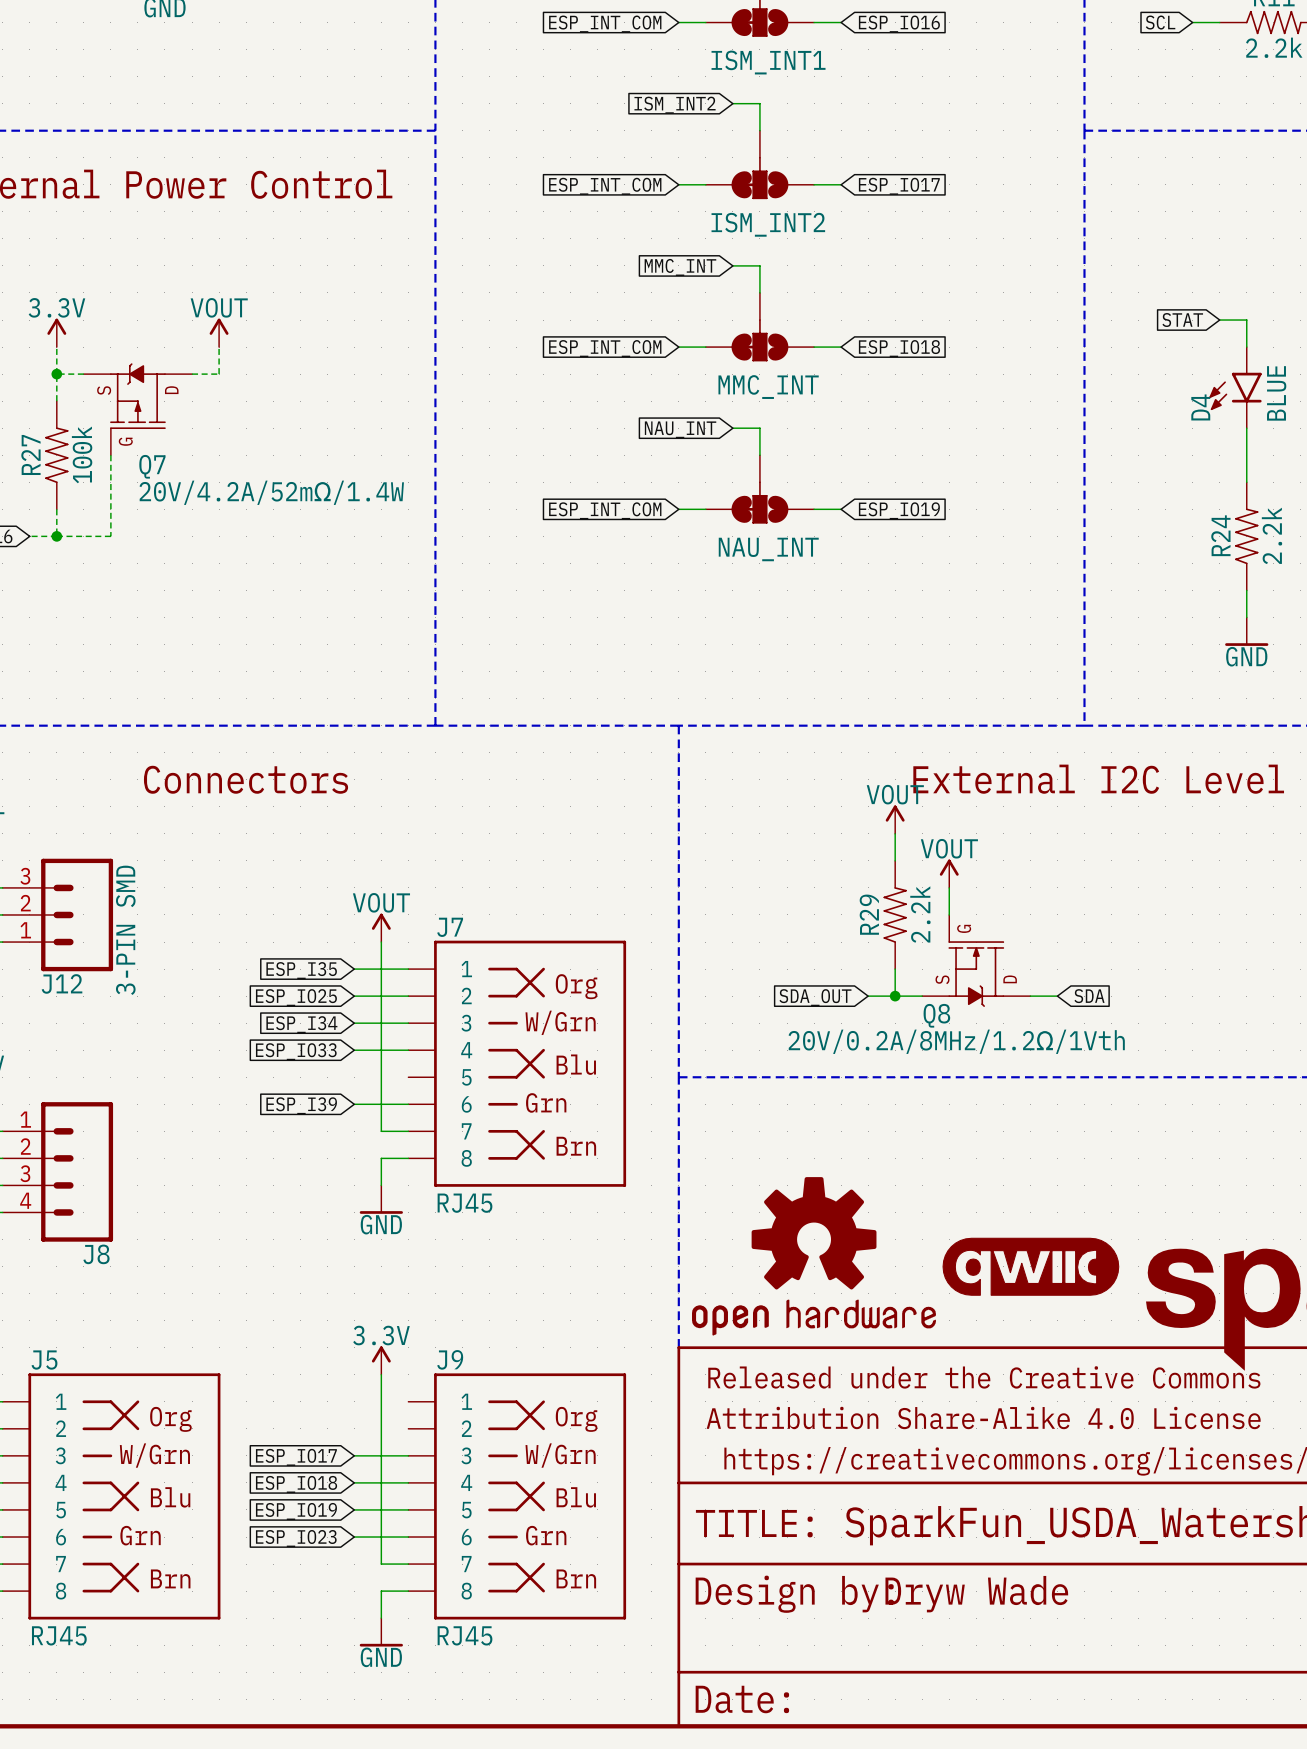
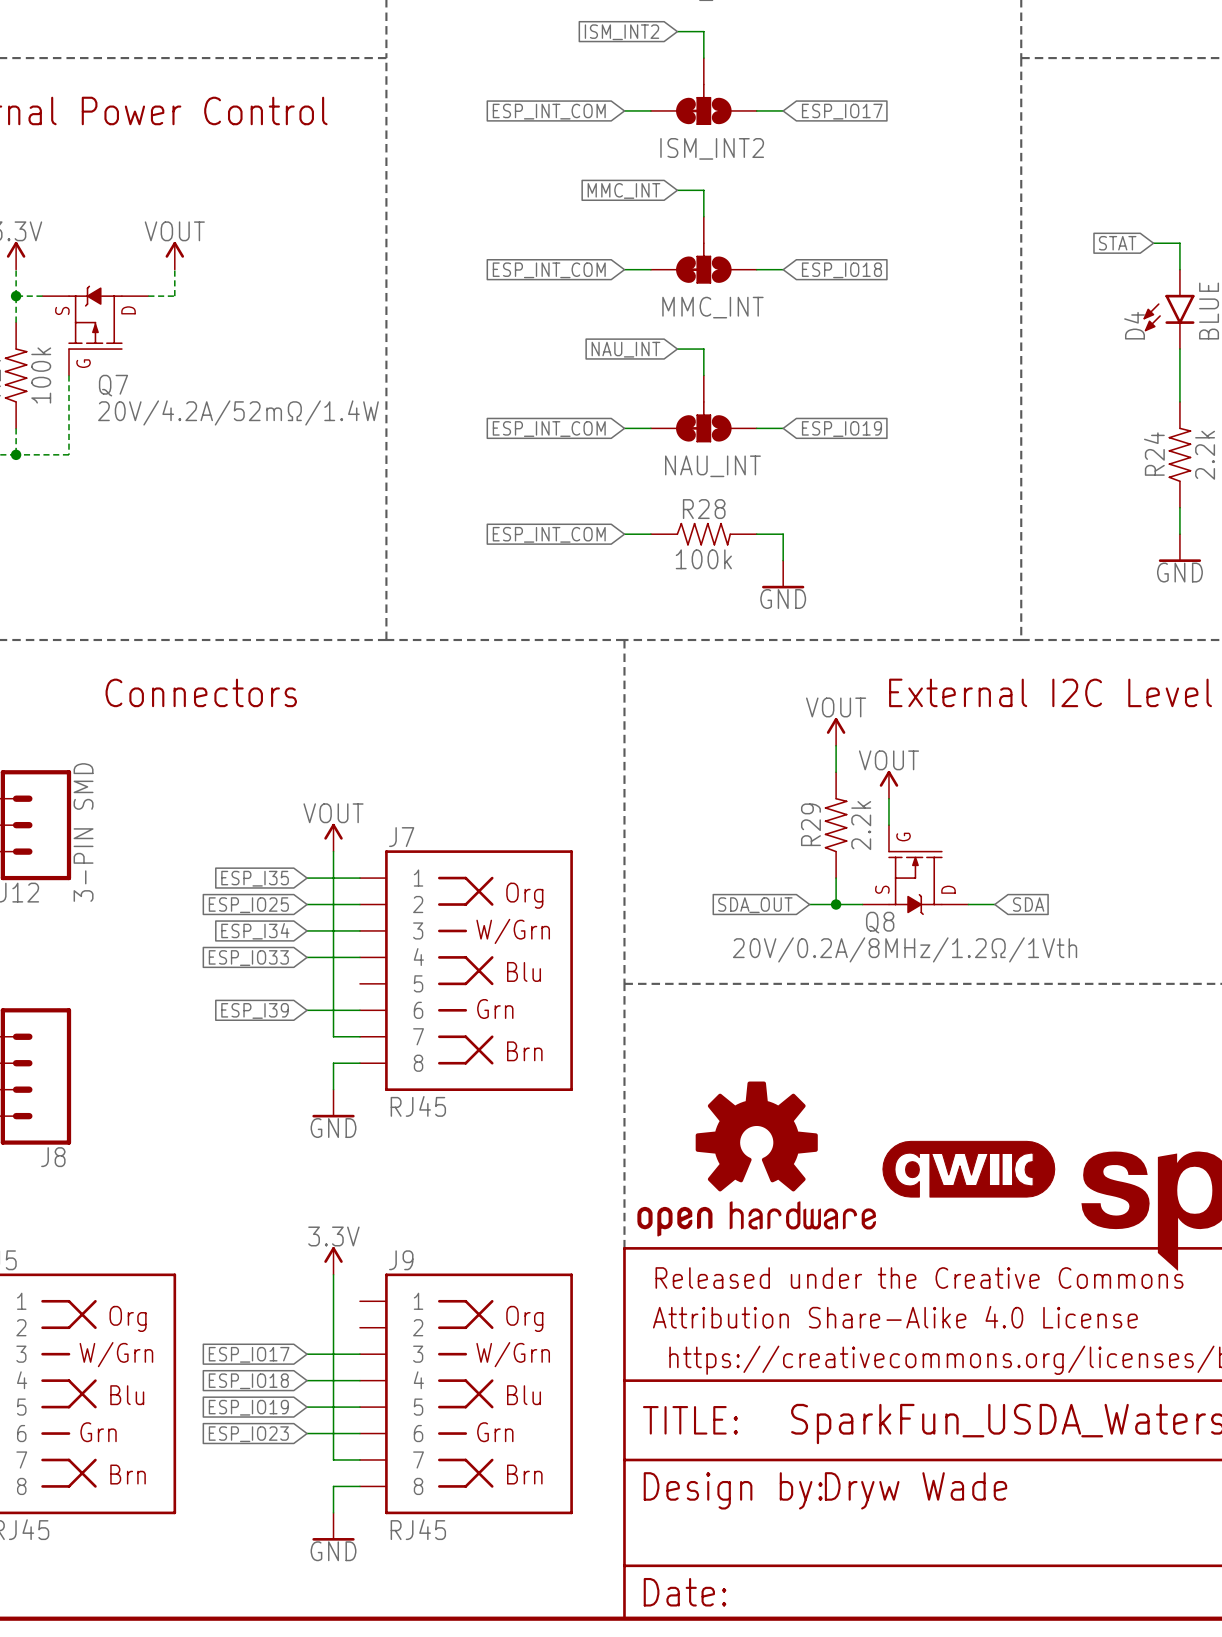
wire: none -> (624, 534) (650, 534)
R28: none -> 100k (703, 534)
wire: none -> (756, 534) (783, 534) (783, 560)
global label: none -> ESP_INT_COM (549, 534)
power symbol: none -> GND (783, 574)

